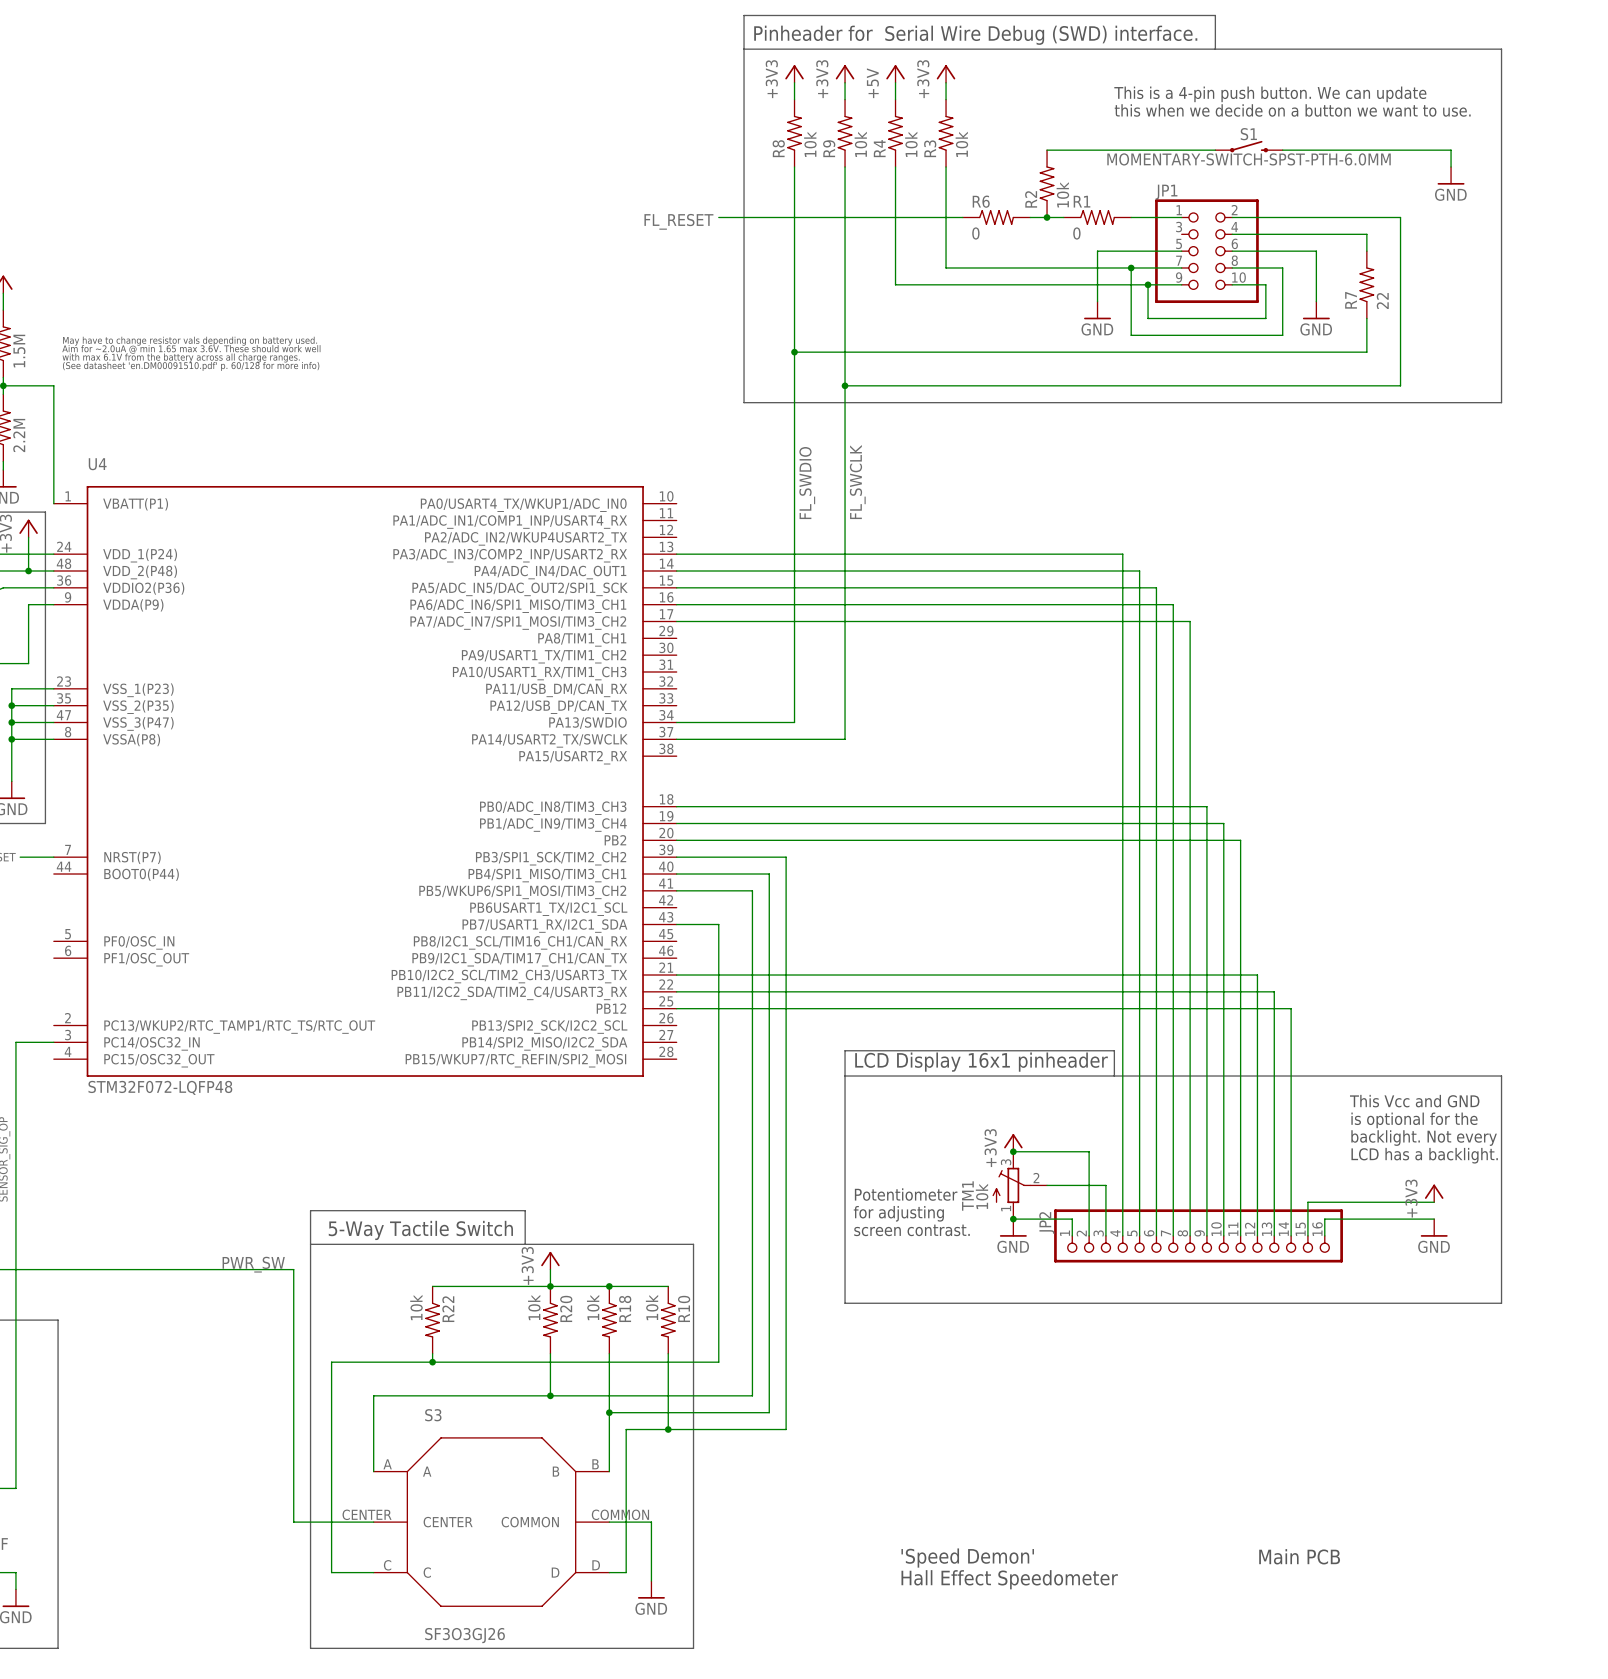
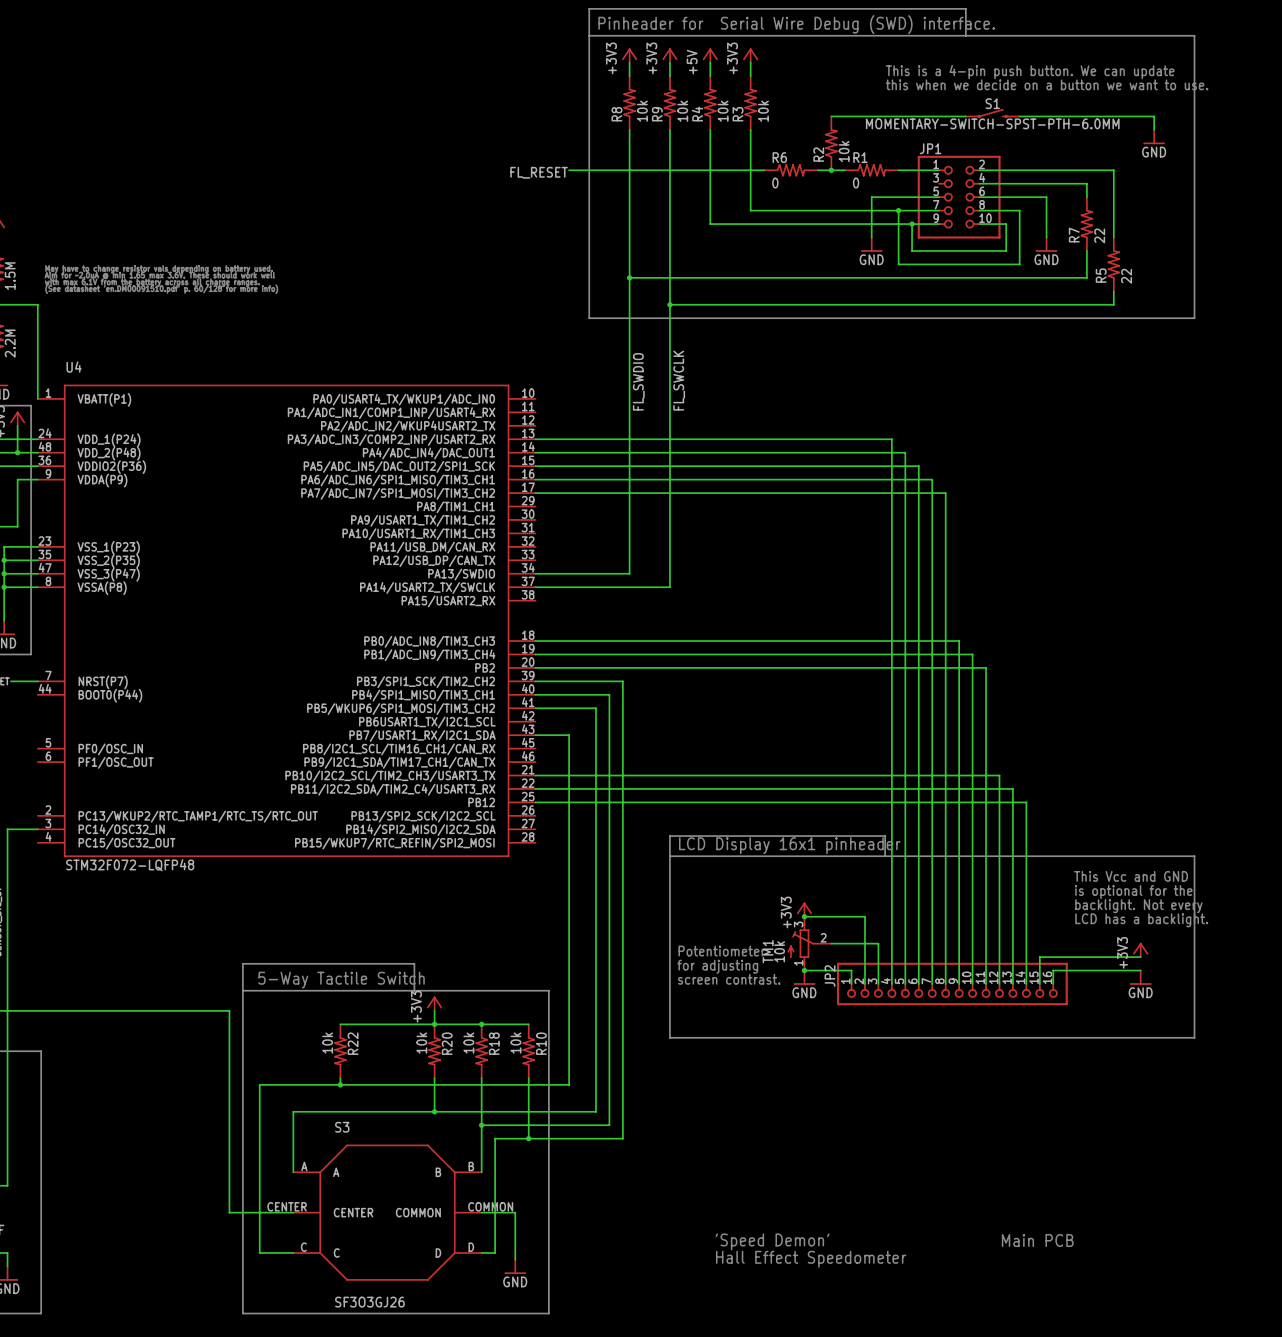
R5: none -> 22 (1113, 264)
label: PWR_SW (253, 1264) -> none

